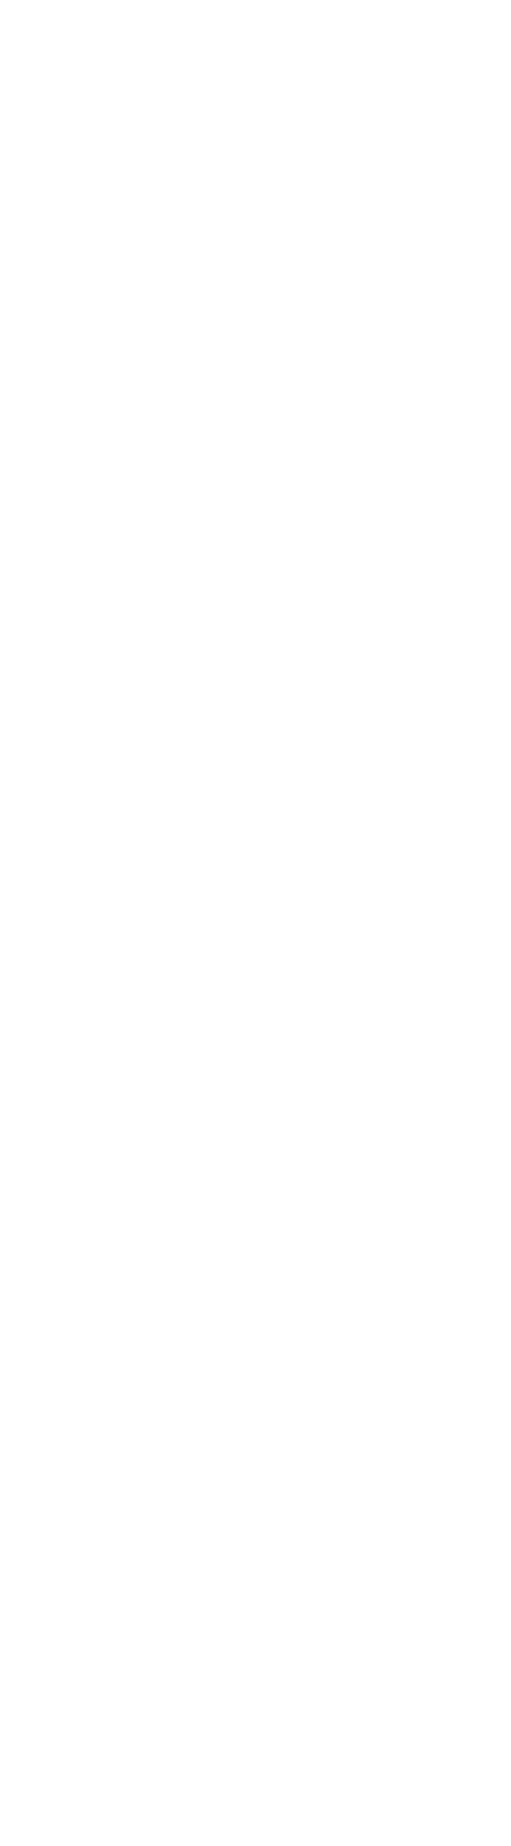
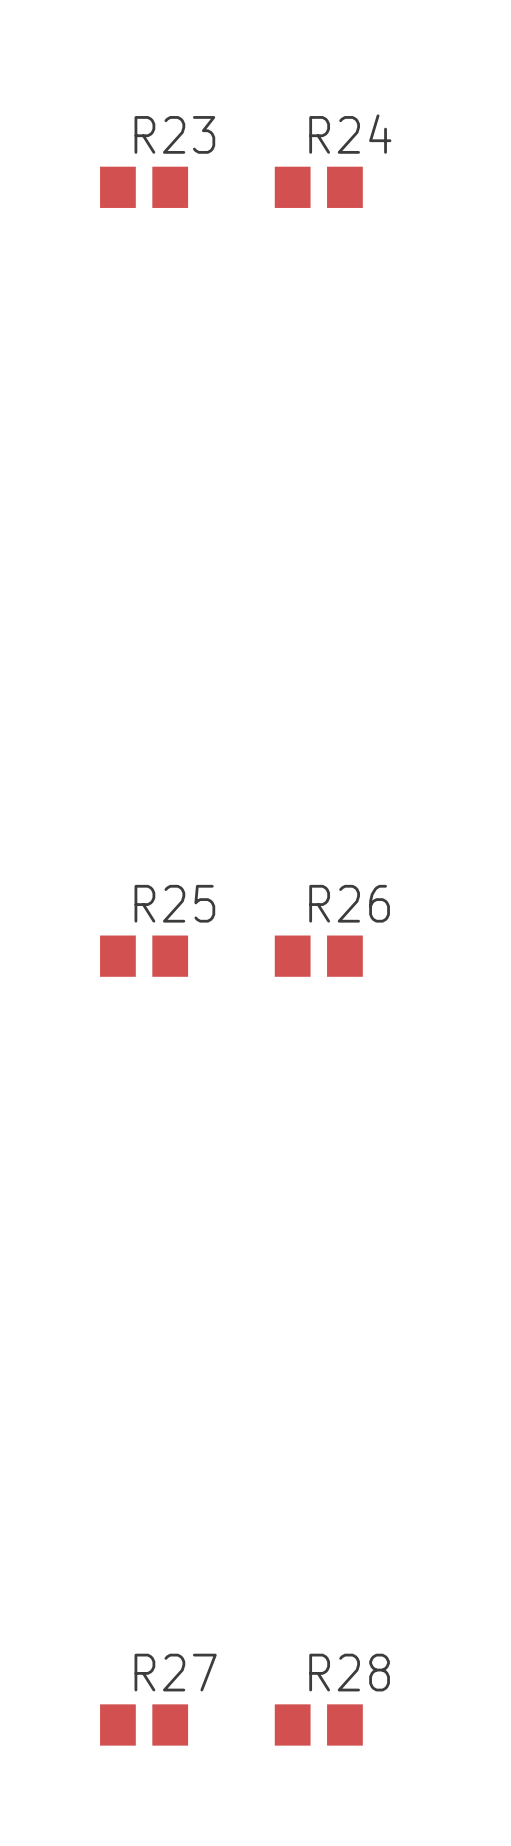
R23: none -> (144, 187)
R24: none -> (318, 187)
R25: none -> (144, 956)
R26: none -> (318, 956)
R27: none -> (144, 1724)
R28: none -> (318, 1724)

